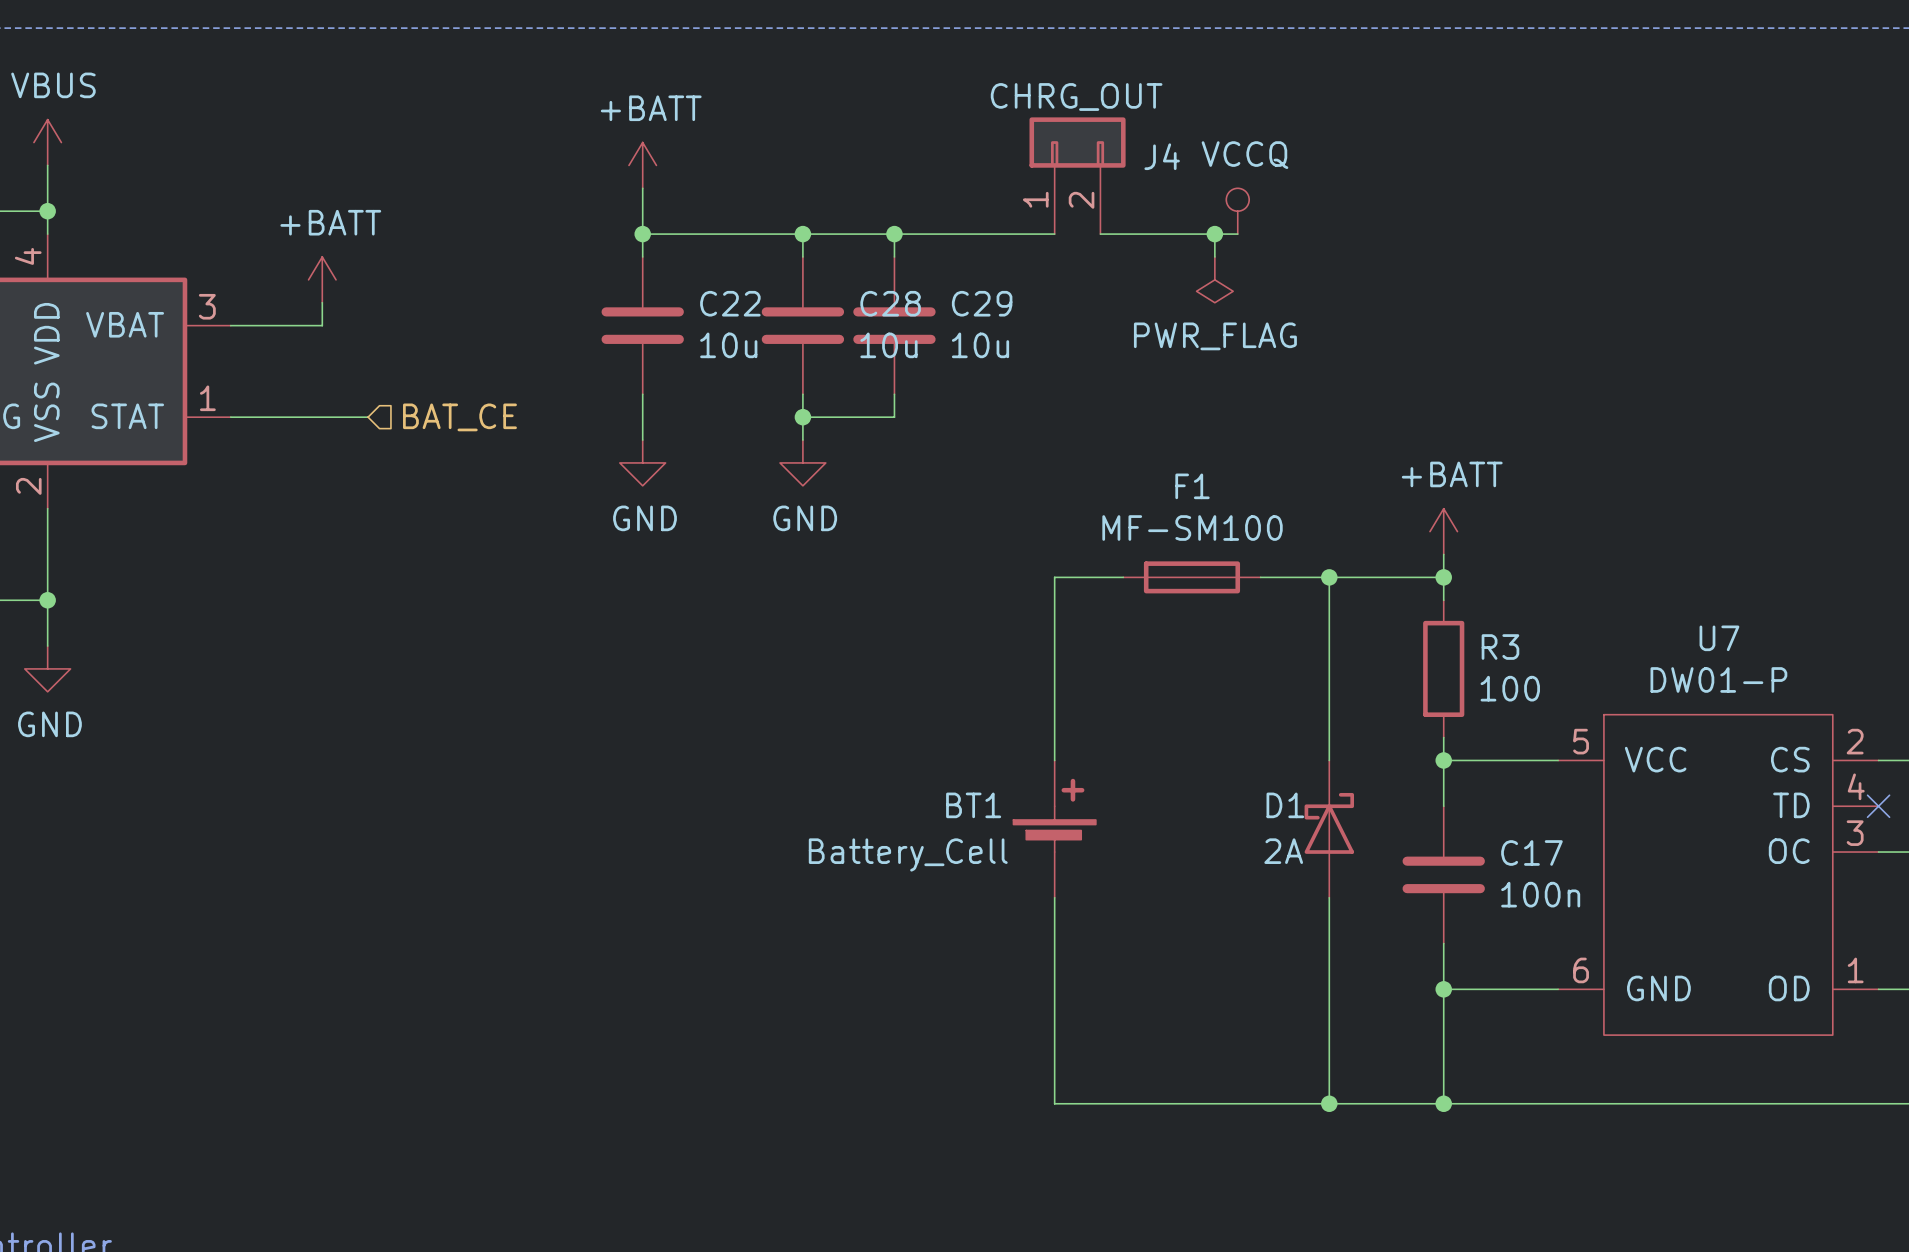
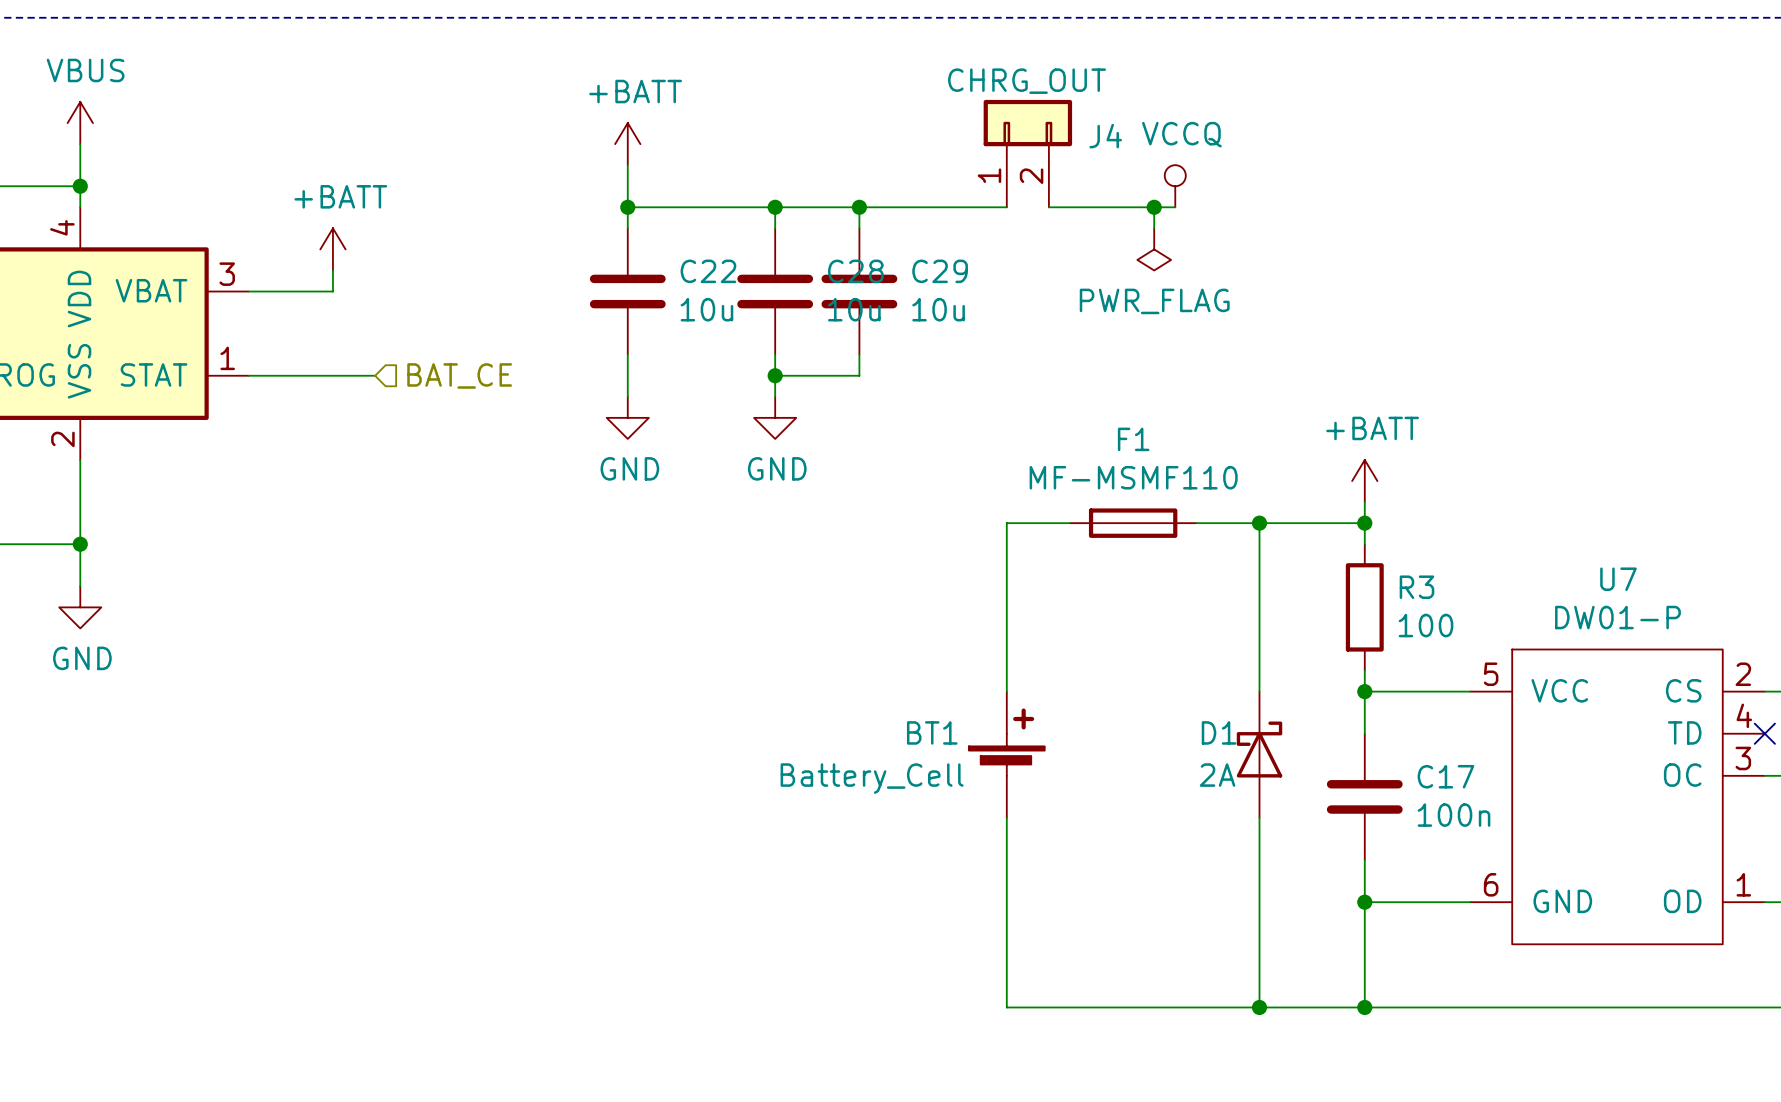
F1 value: MF-SM100 (1192, 528) -> MF-MSMF110 (1133, 477)

